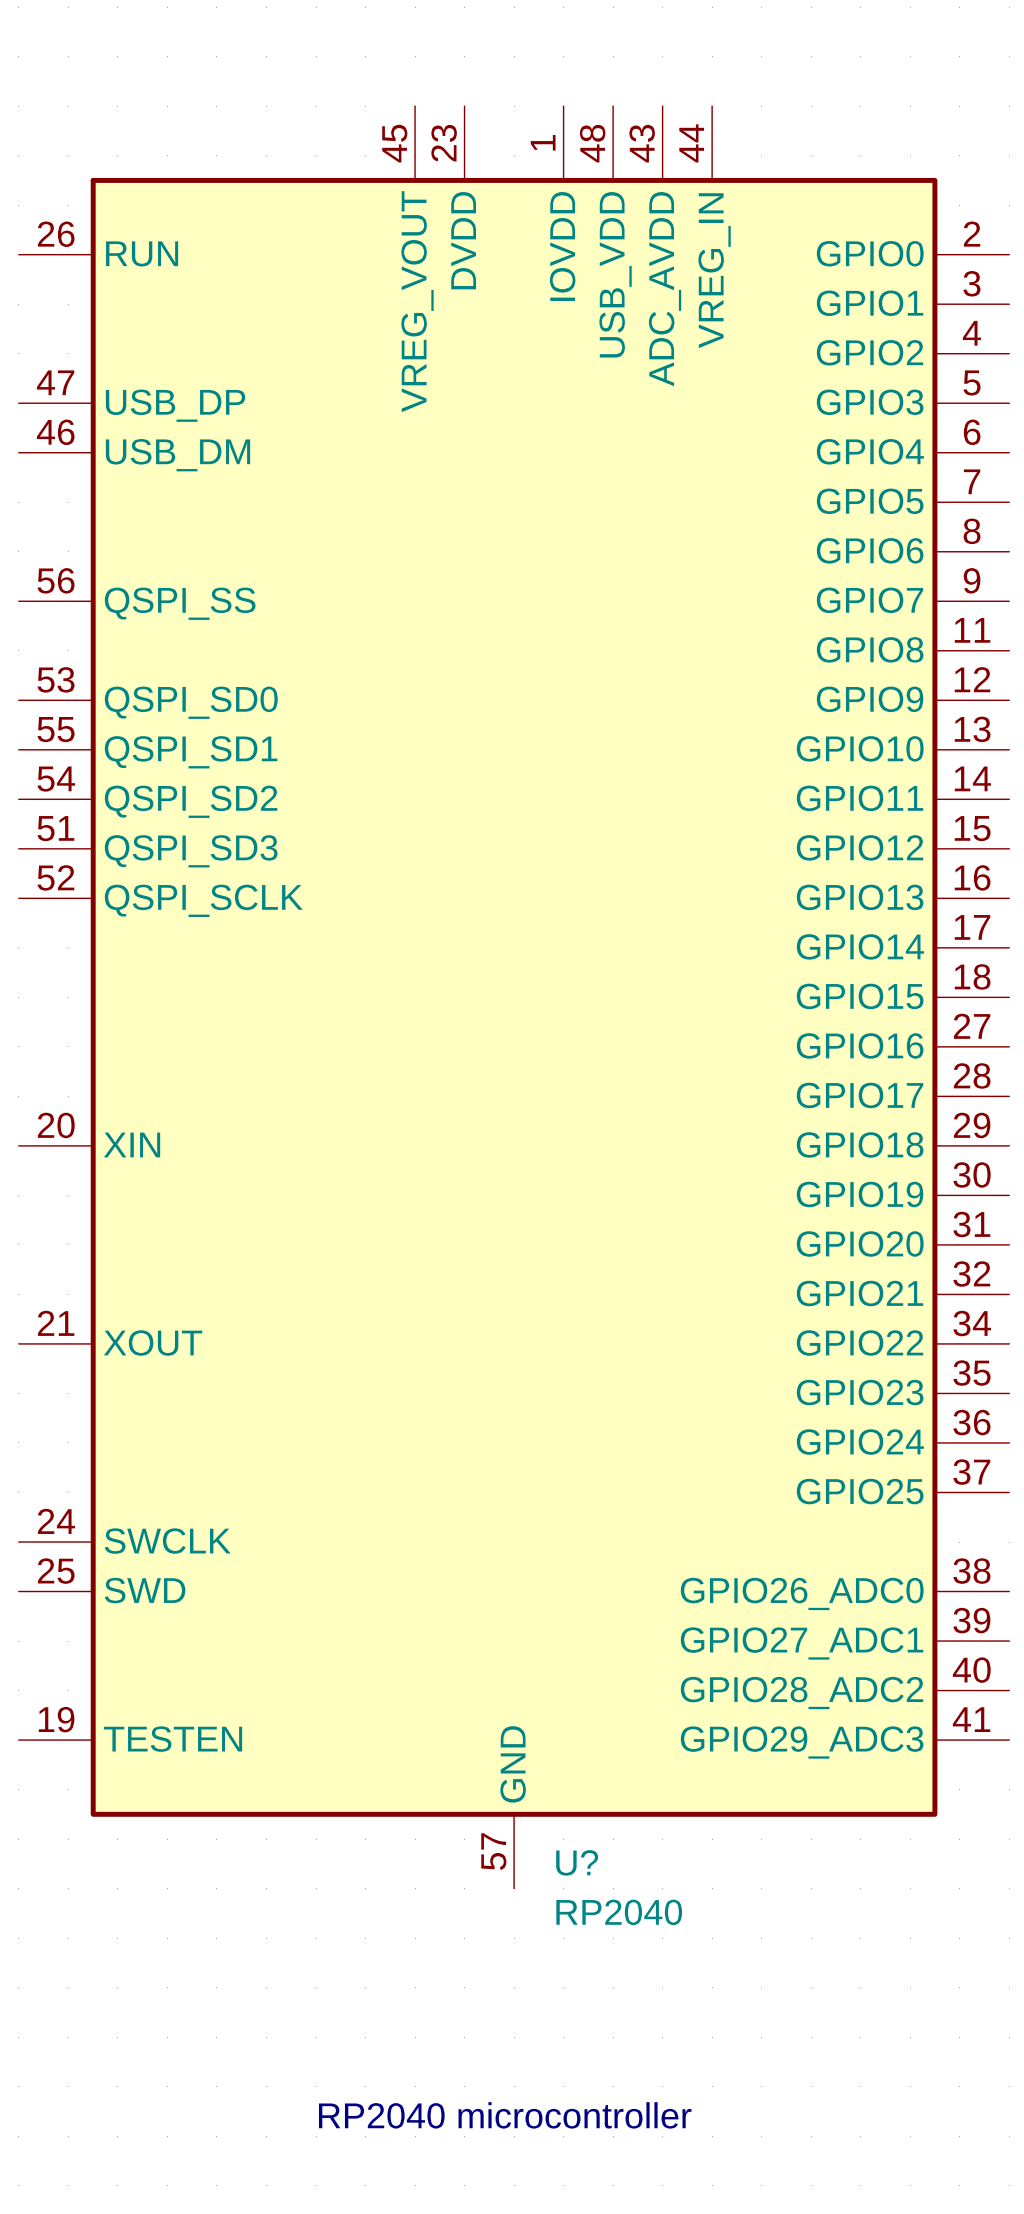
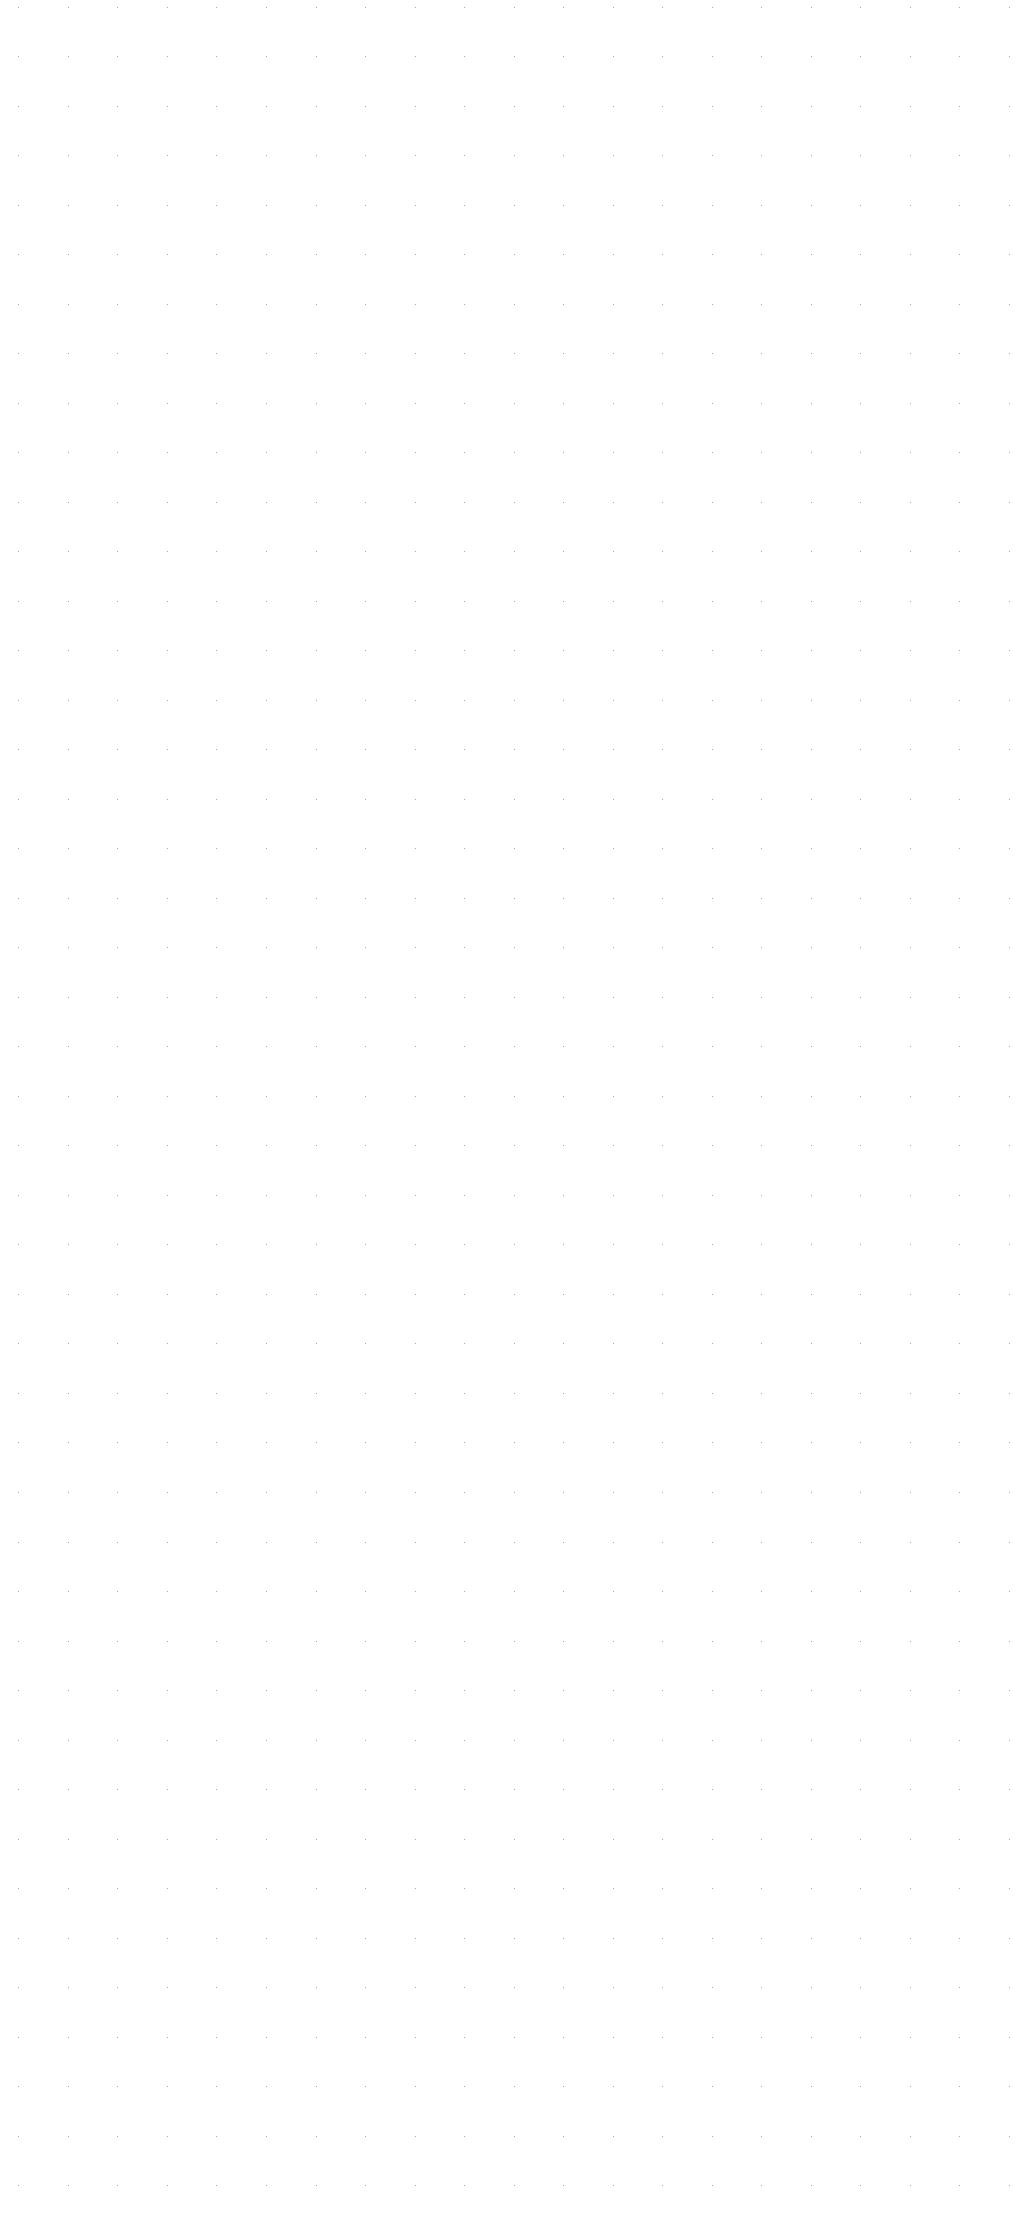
U?: RP2040 (514, 997) -> none
text: RP2040 microcontroller (505, 2115) -> none

